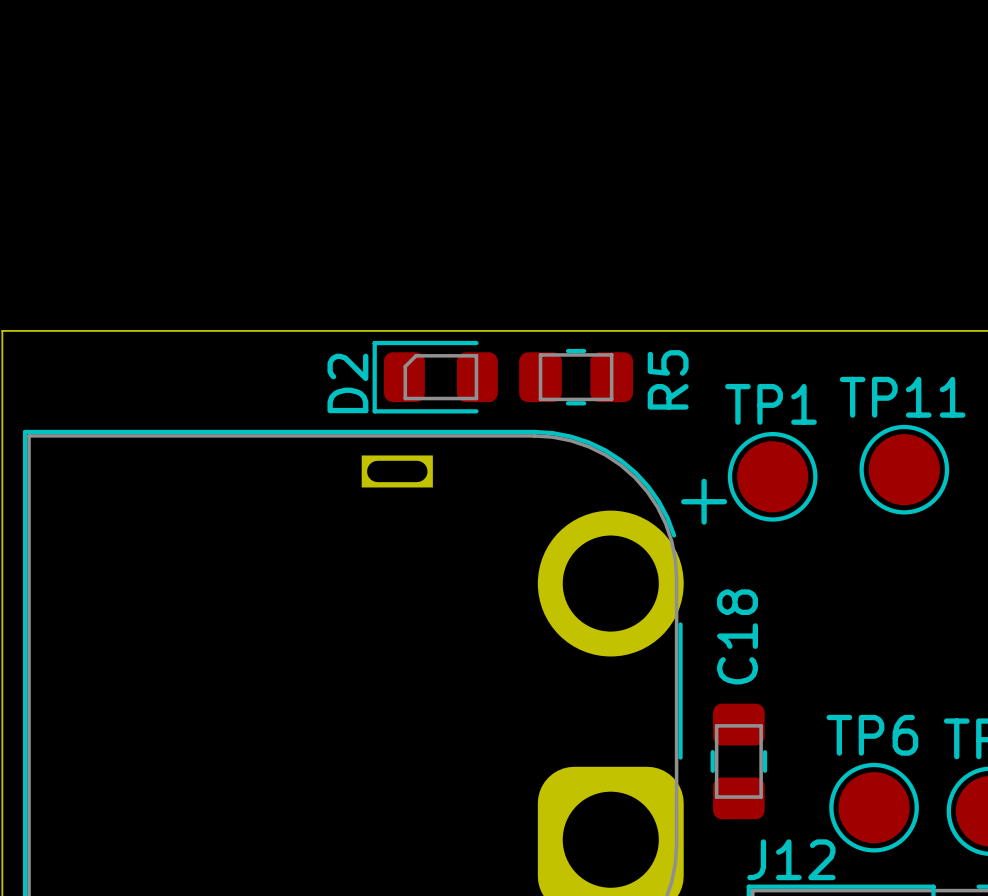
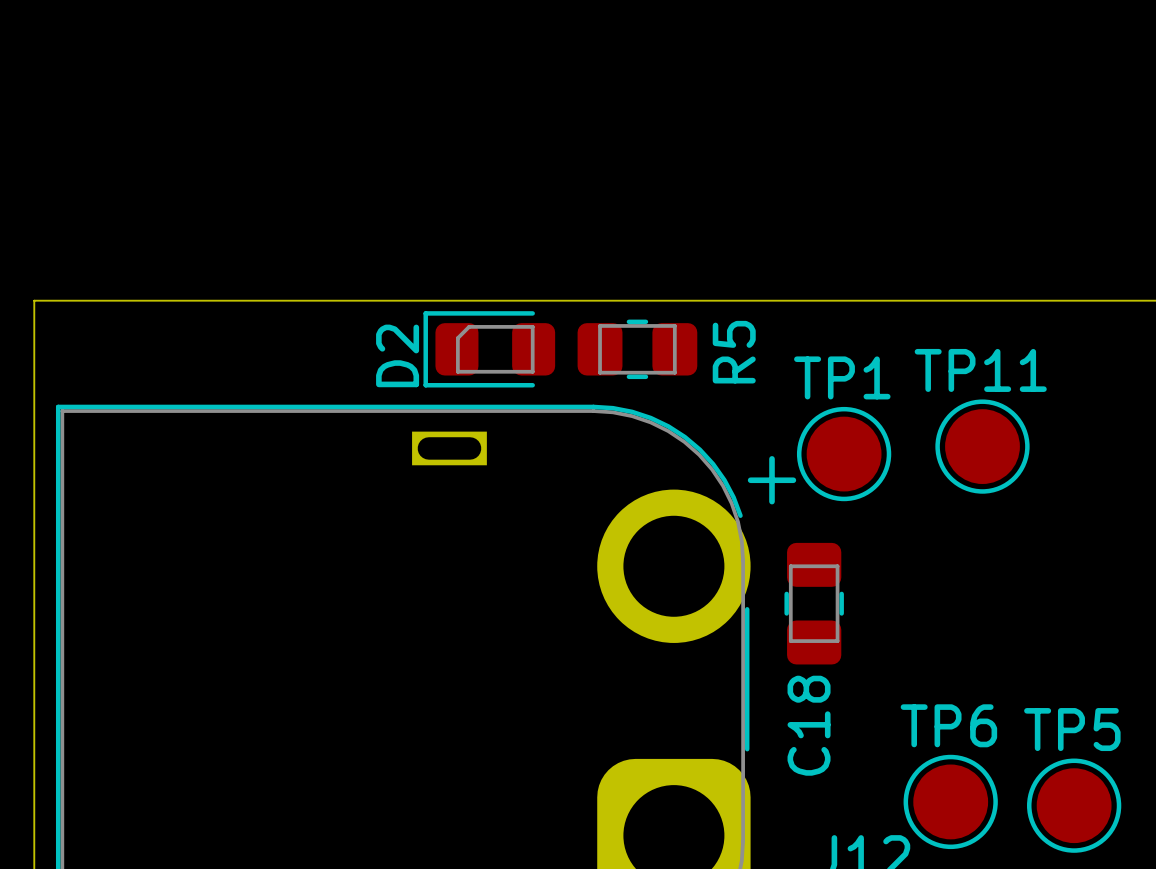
C18 name position: C18 (737, 636) -> C18 (809, 725)
C18 position: (738, 761) -> (814, 603)

